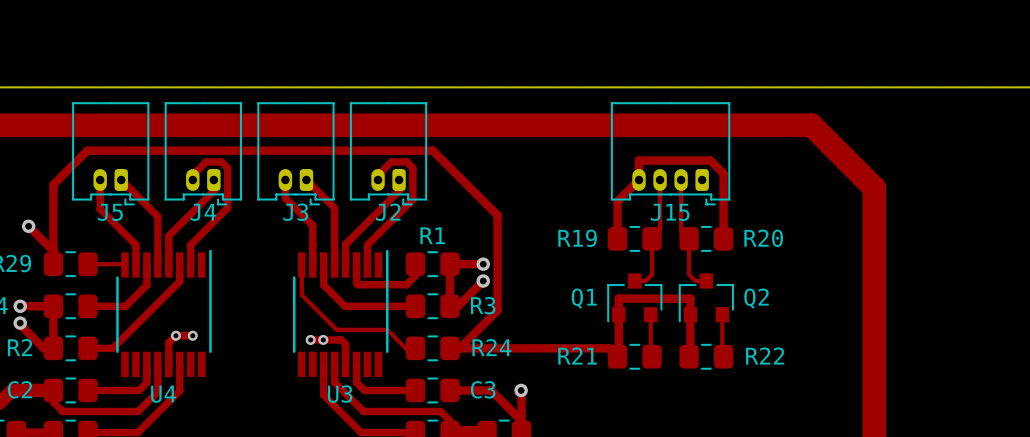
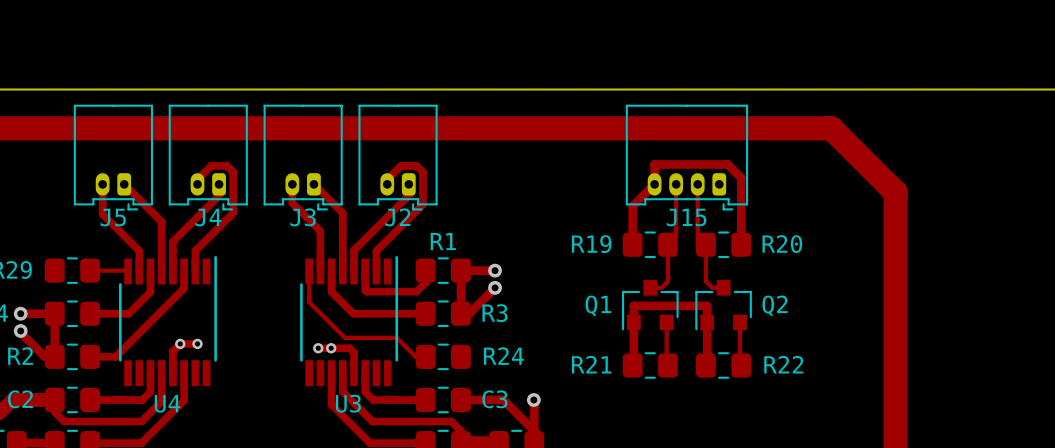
track: (28, 226) (53, 251) -> none
via: (28, 226) -> none
track: (53, 264) (53, 184) (87, 150) (432, 150) (497, 215) (497, 310) (459, 348) -> none
track: (450, 348) (609, 348) (617, 356) -> none

